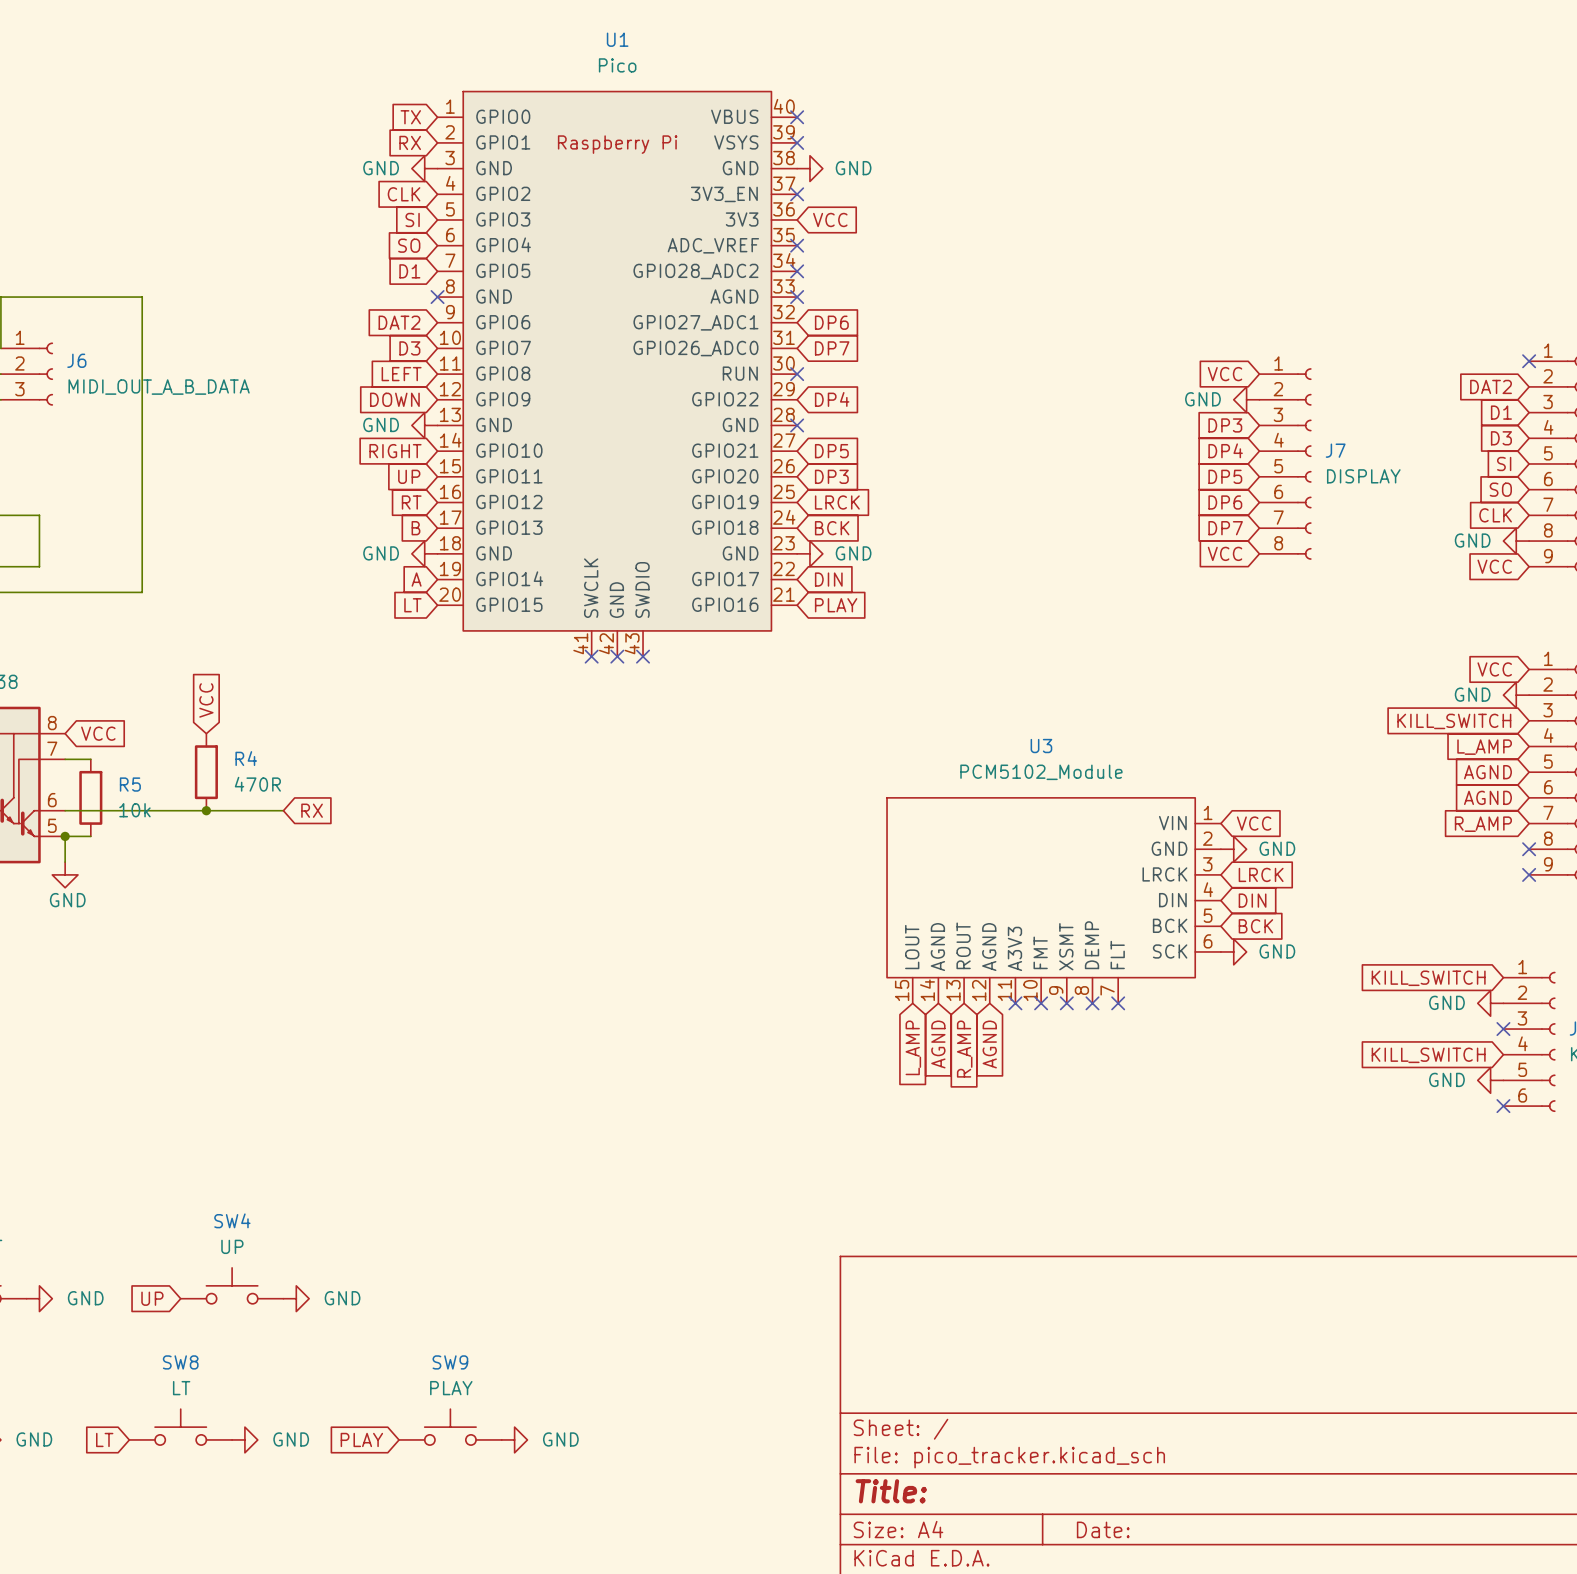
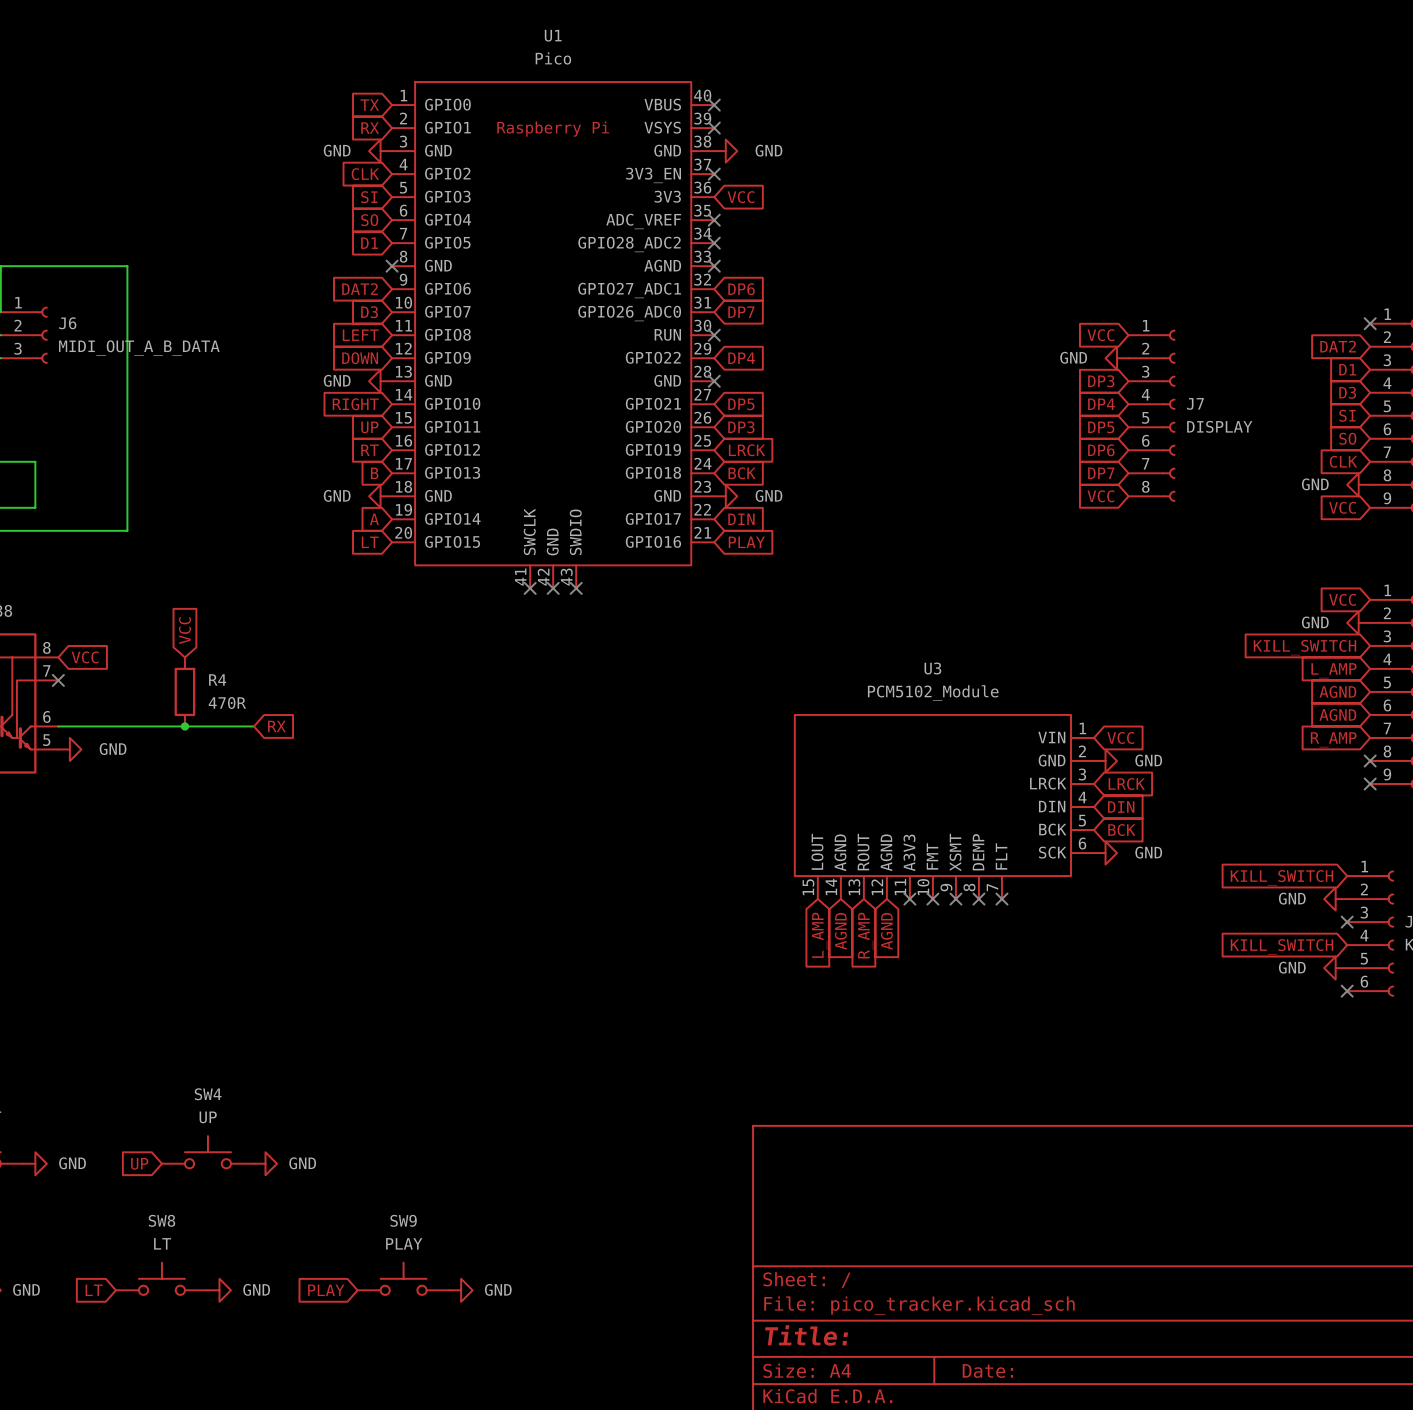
wire: (65, 759) (90, 759) -> none
no-connect mark: none -> (58, 680)
R5: 10k (90, 797) -> none
junction: (65, 836) -> none
wire: (90, 836) (65, 836) (65, 862) -> none
power symbol rotation: 0° (65, 874) -> 90° counterclockwise (69, 749)
power symbol position: GND (65, 874) -> GND (69, 749)

